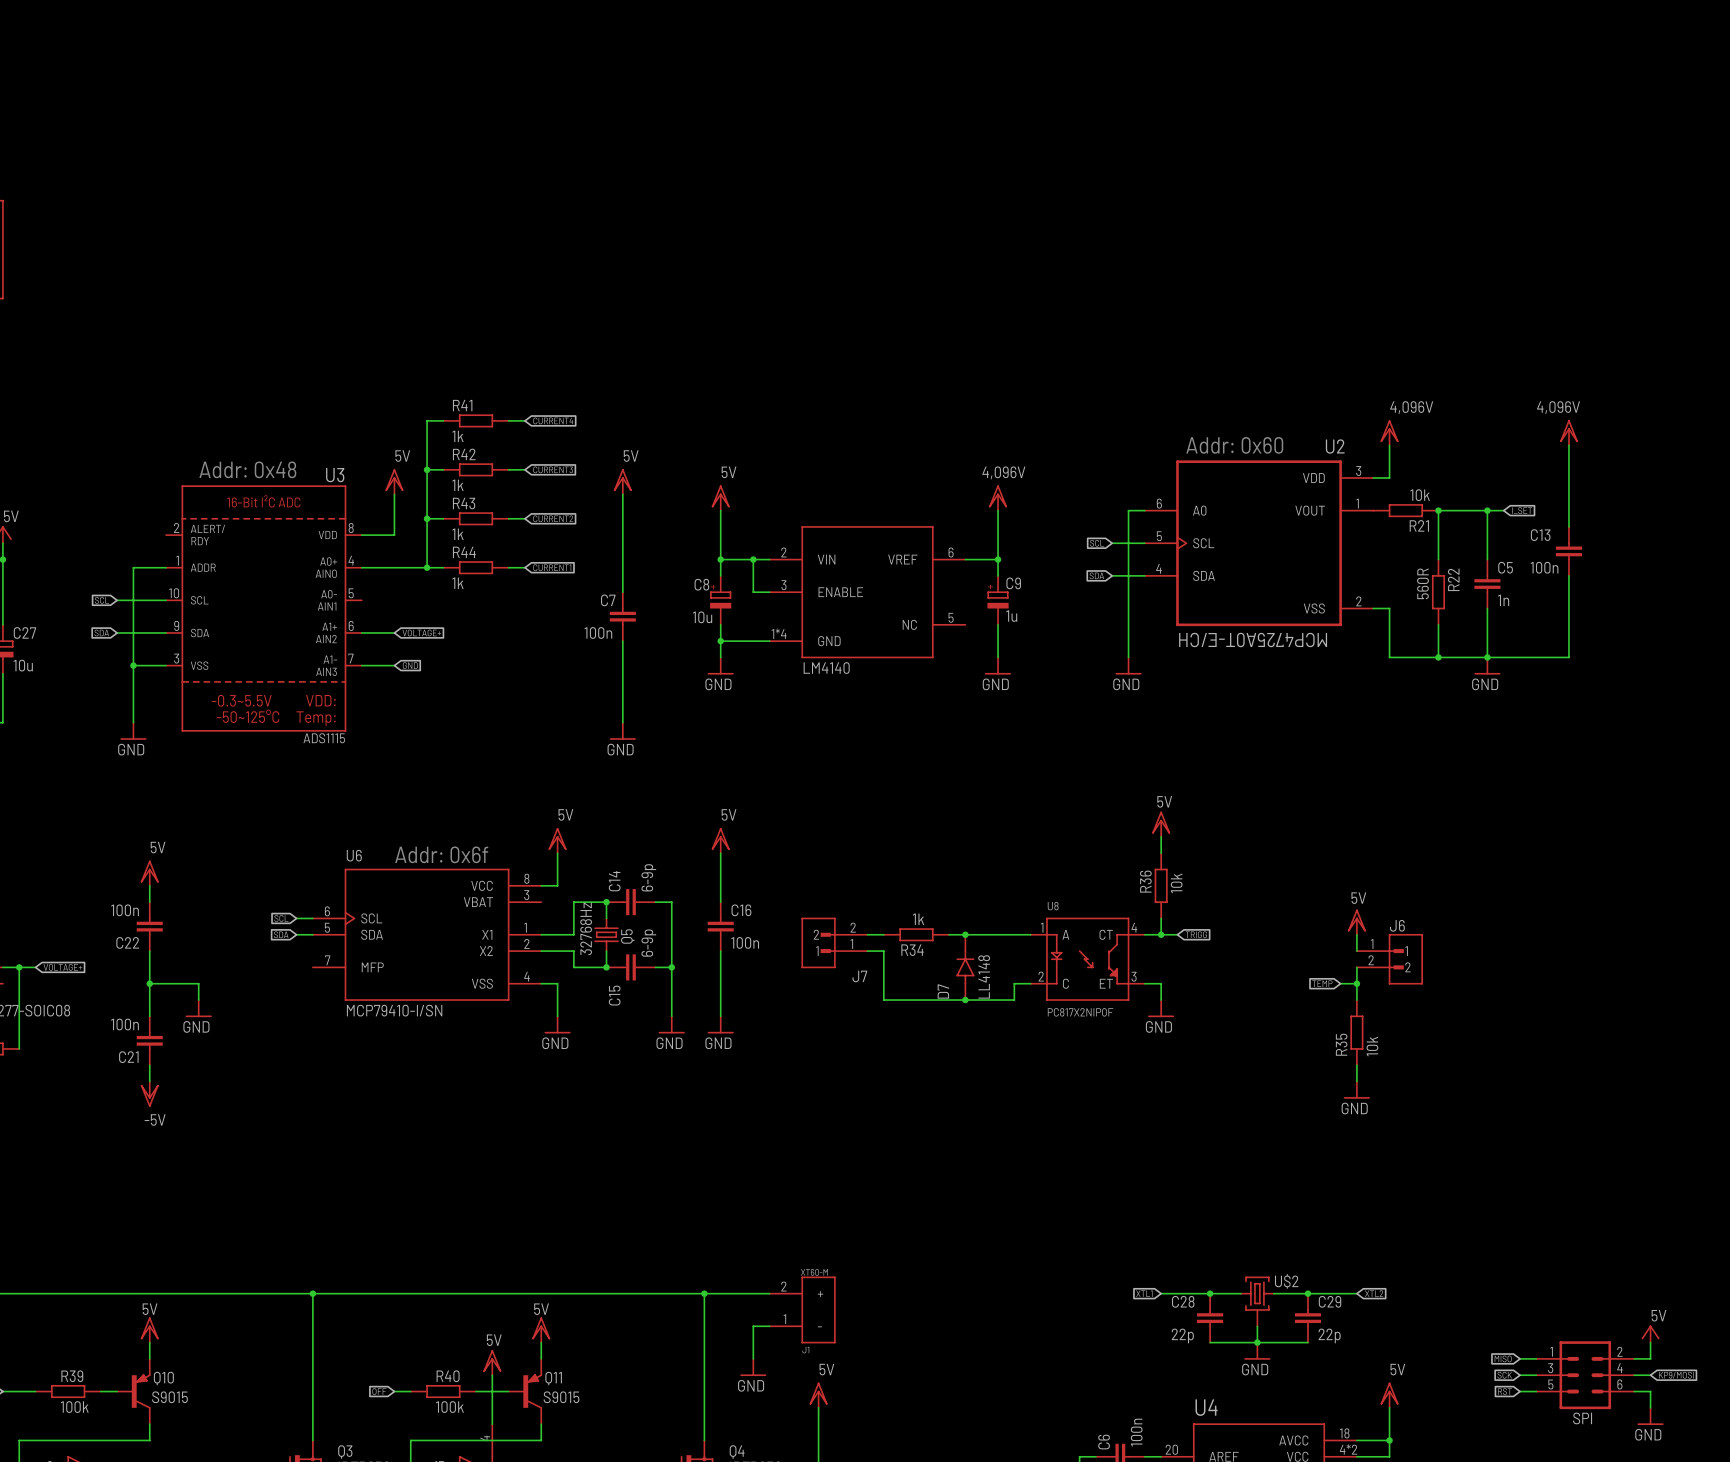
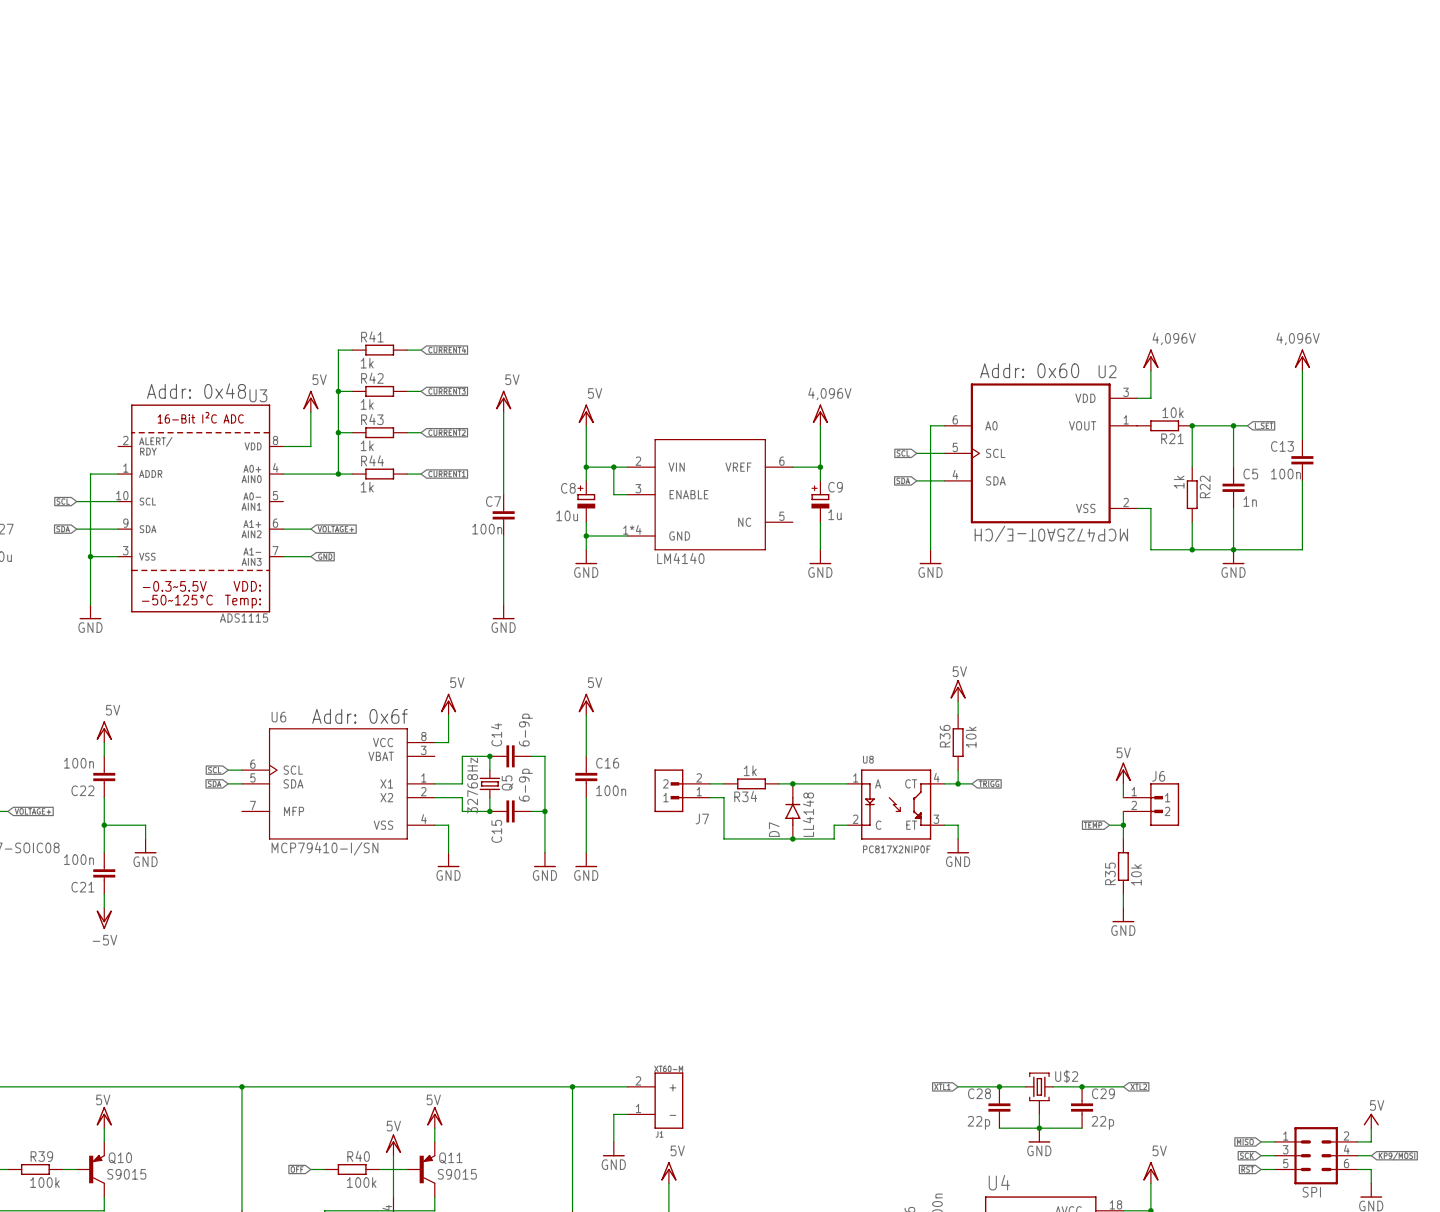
R22 value: 560R (1422, 583) -> 1k (1179, 482)

